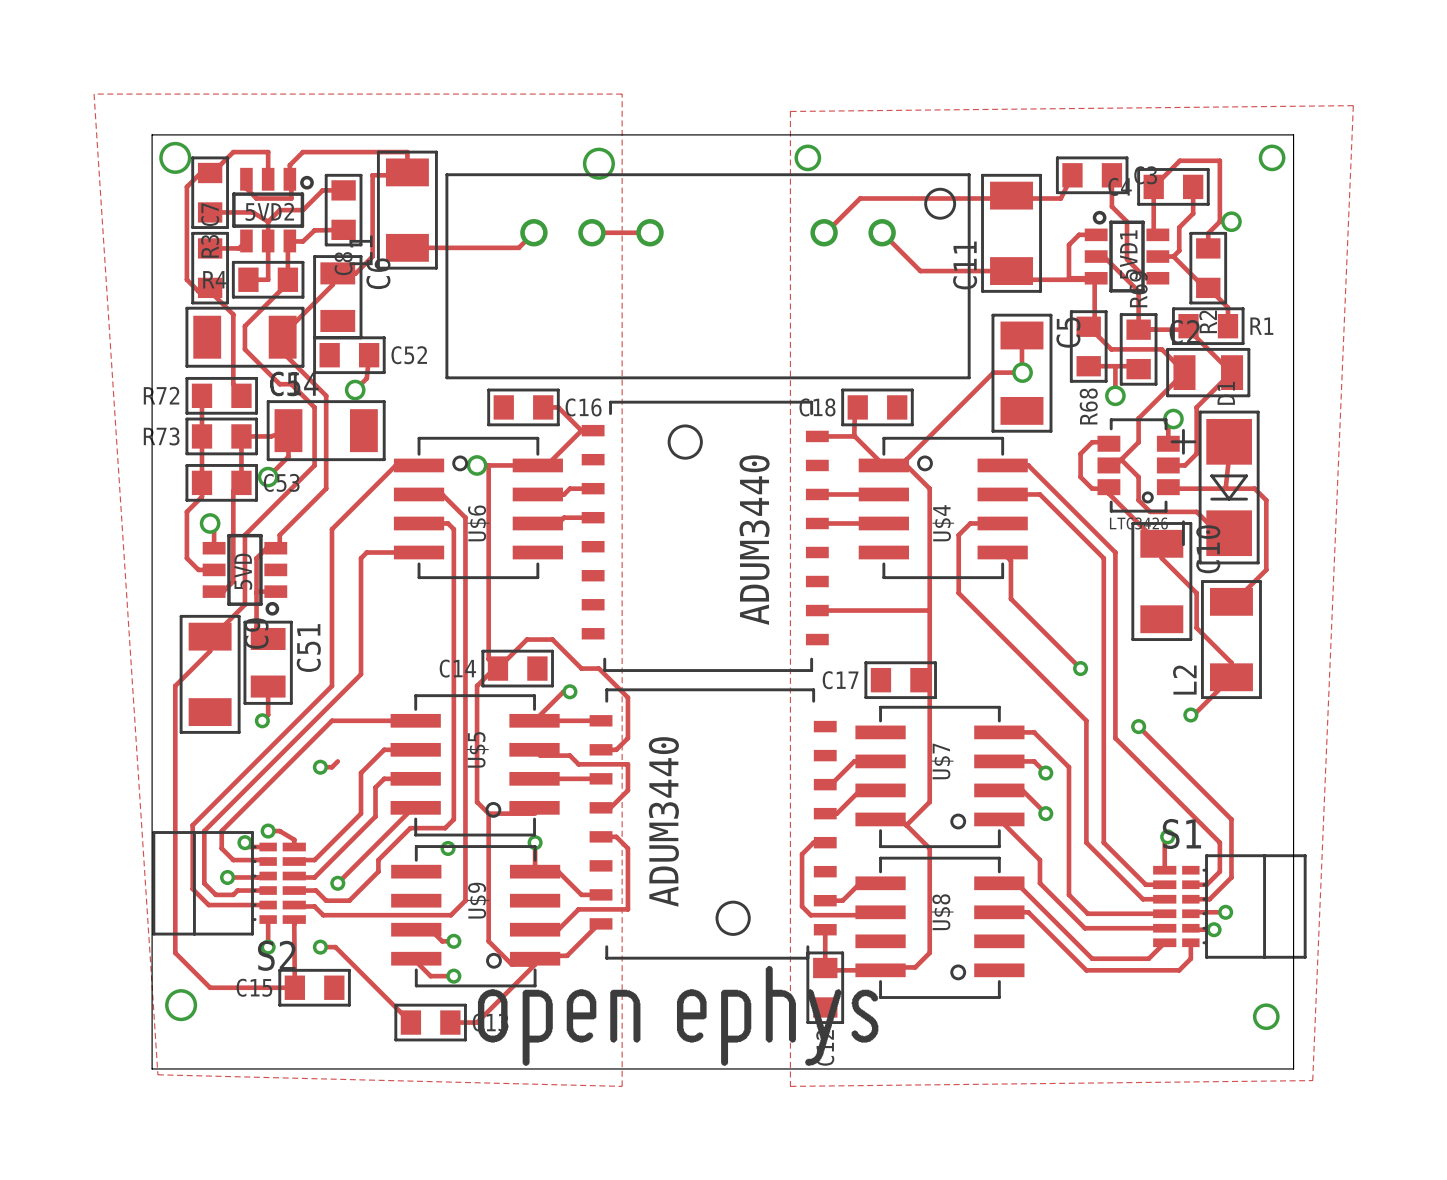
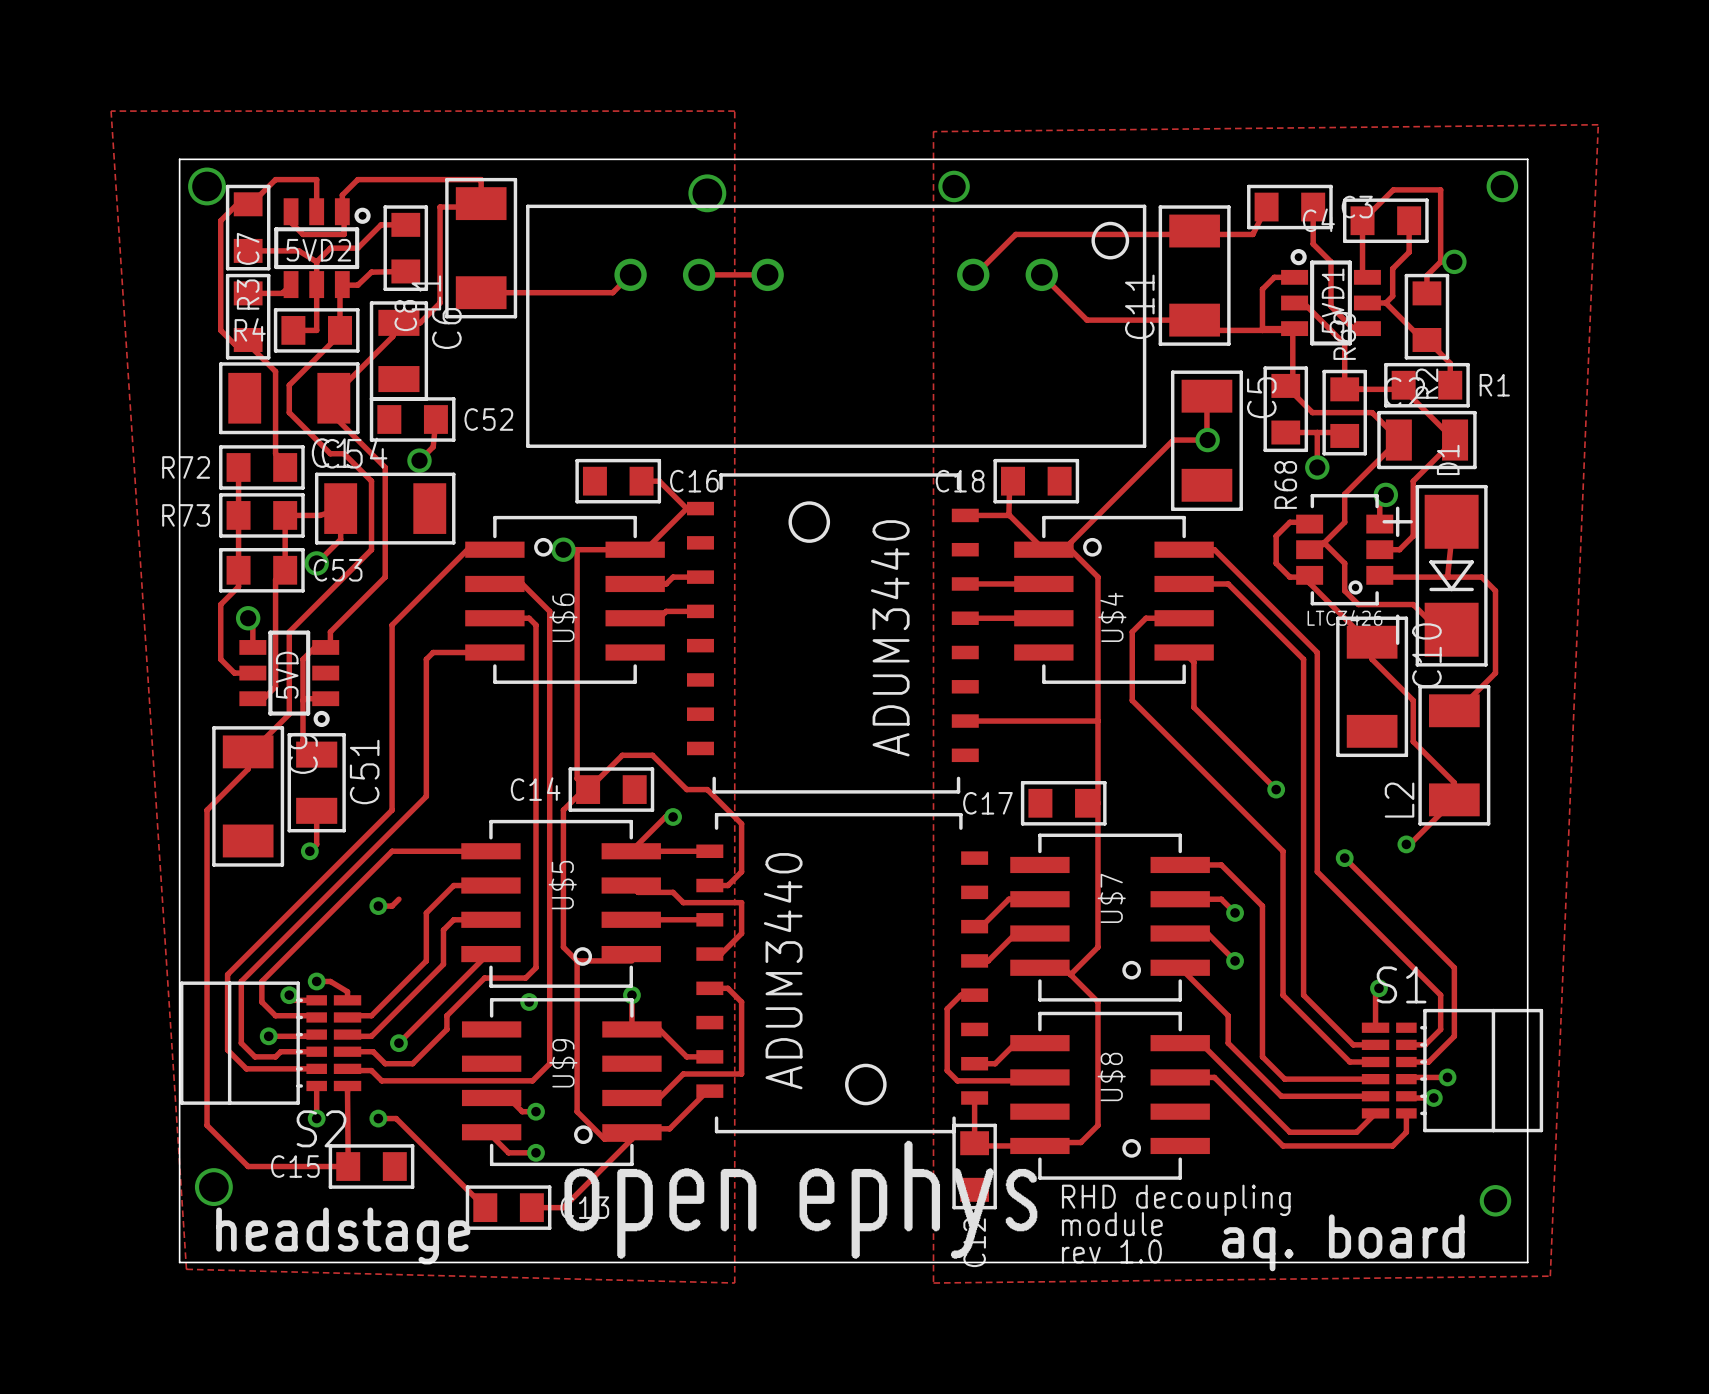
text: none -> RHD decoupling (1176, 1200)
text: none -> module (1112, 1224)
text: none -> headstage (343, 1235)
text: none -> aq. board (1343, 1242)
text: none -> rev 1.0 (1111, 1251)

